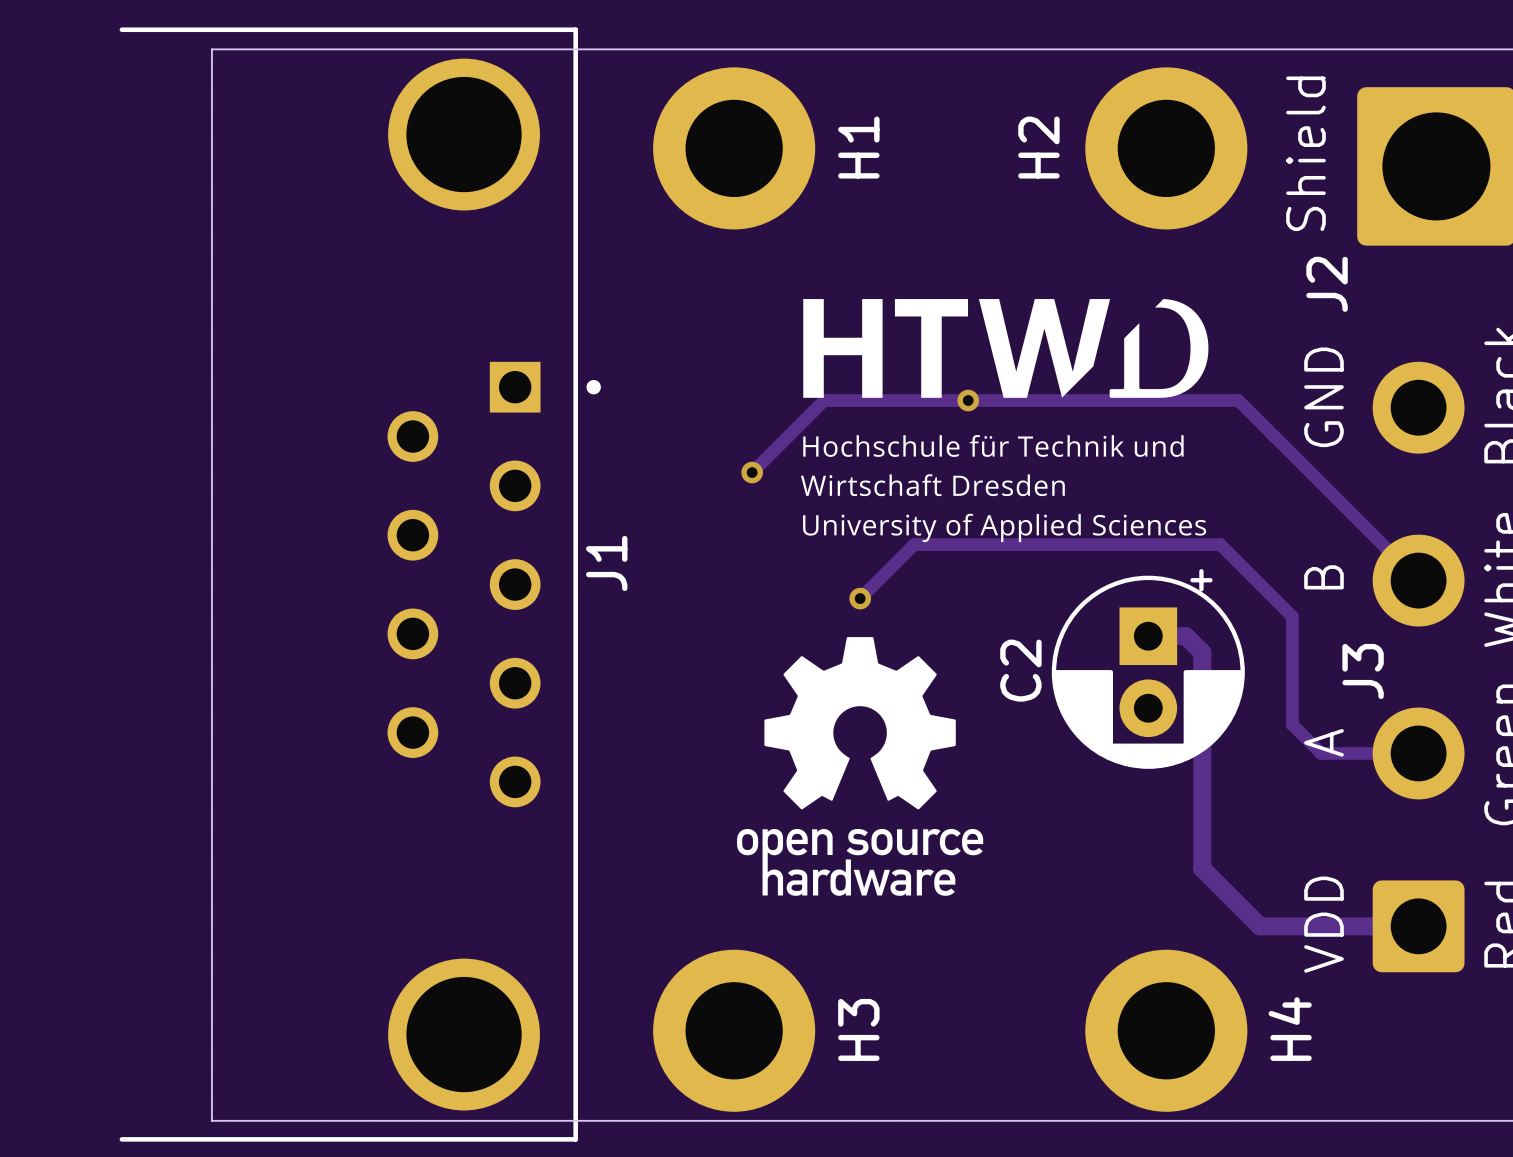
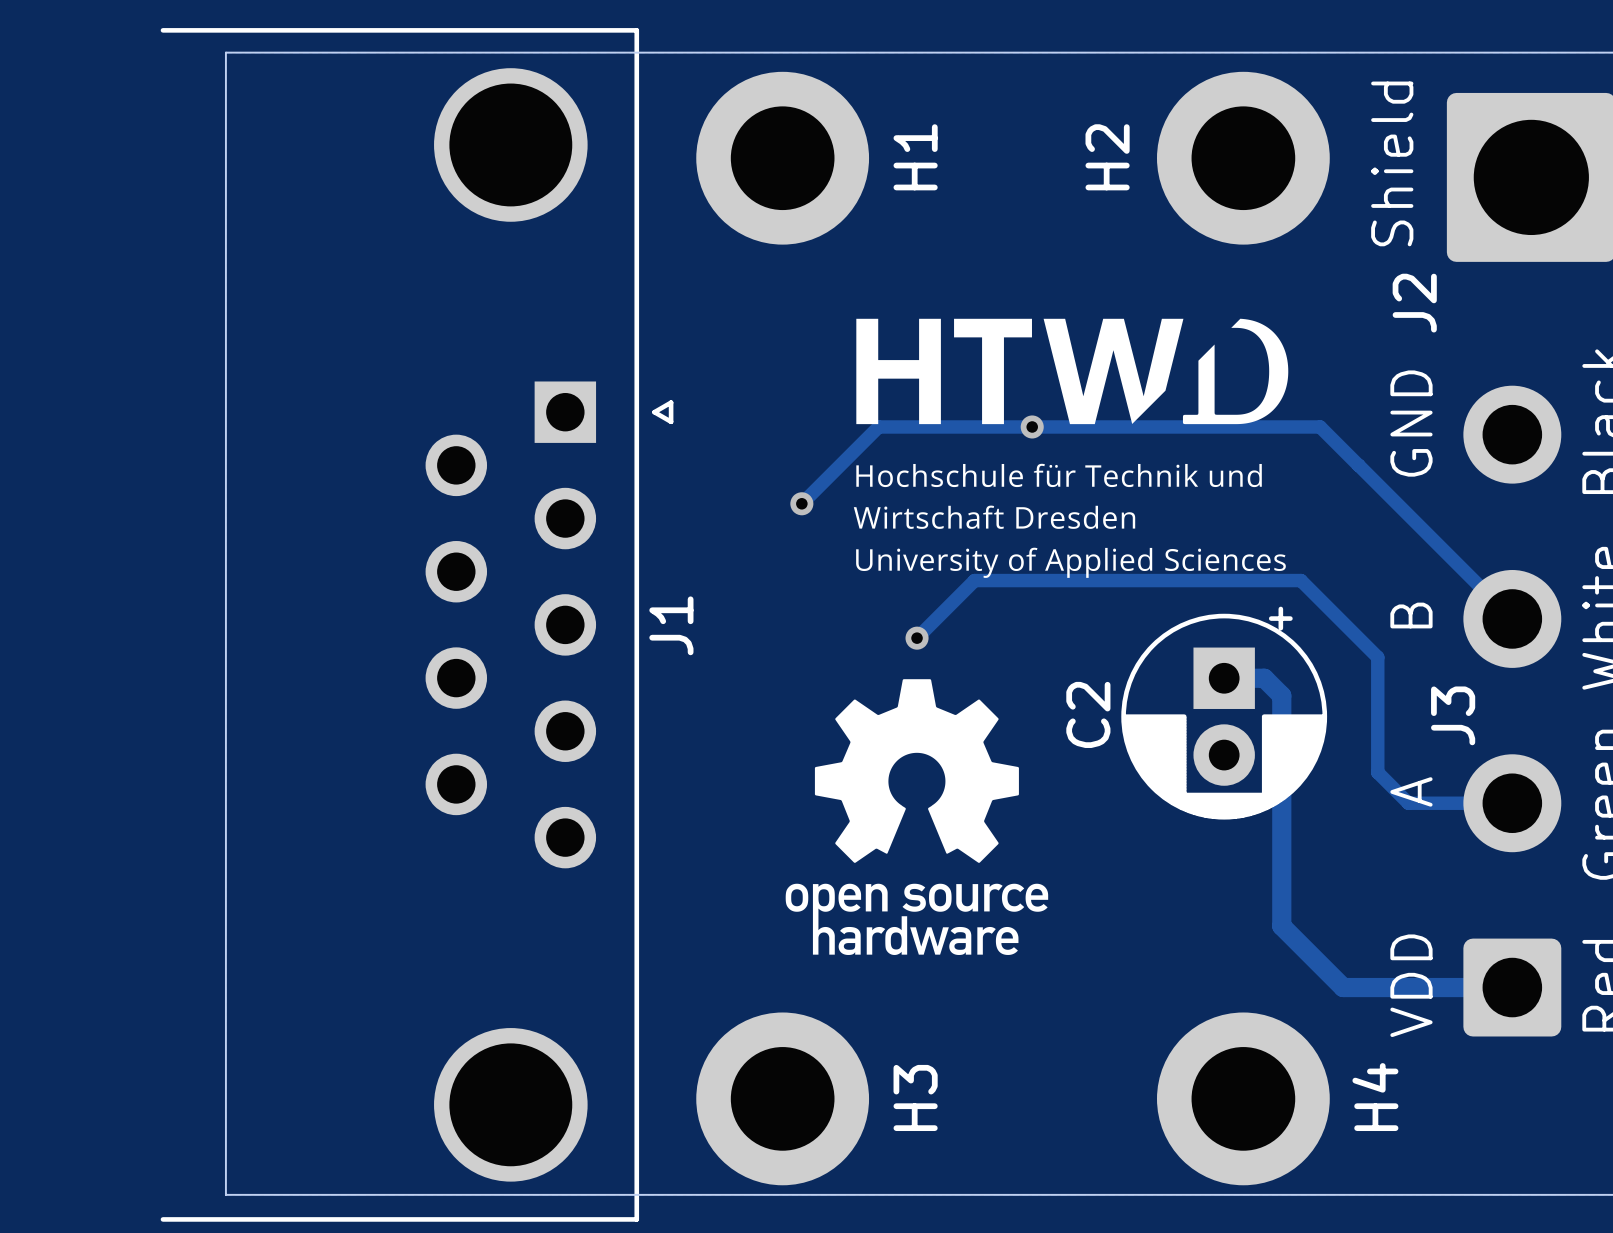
J1 footprint: [119, 27, 601, 1142] -> [160, 28, 674, 1222]
J1 name position: J1 (606, 563) -> J1 (671, 625)

